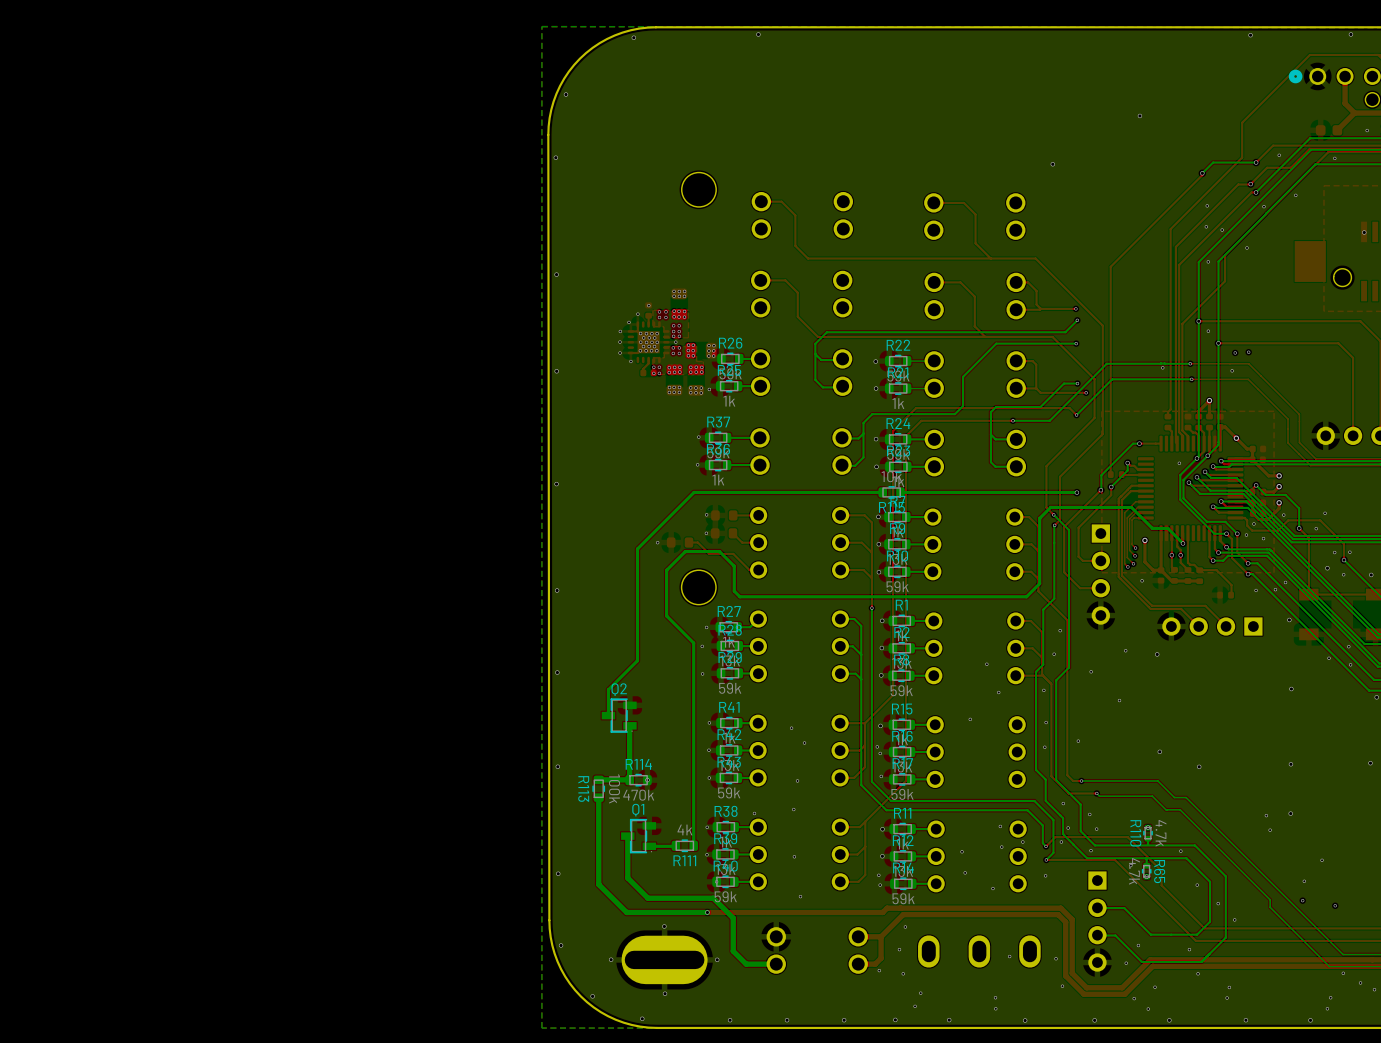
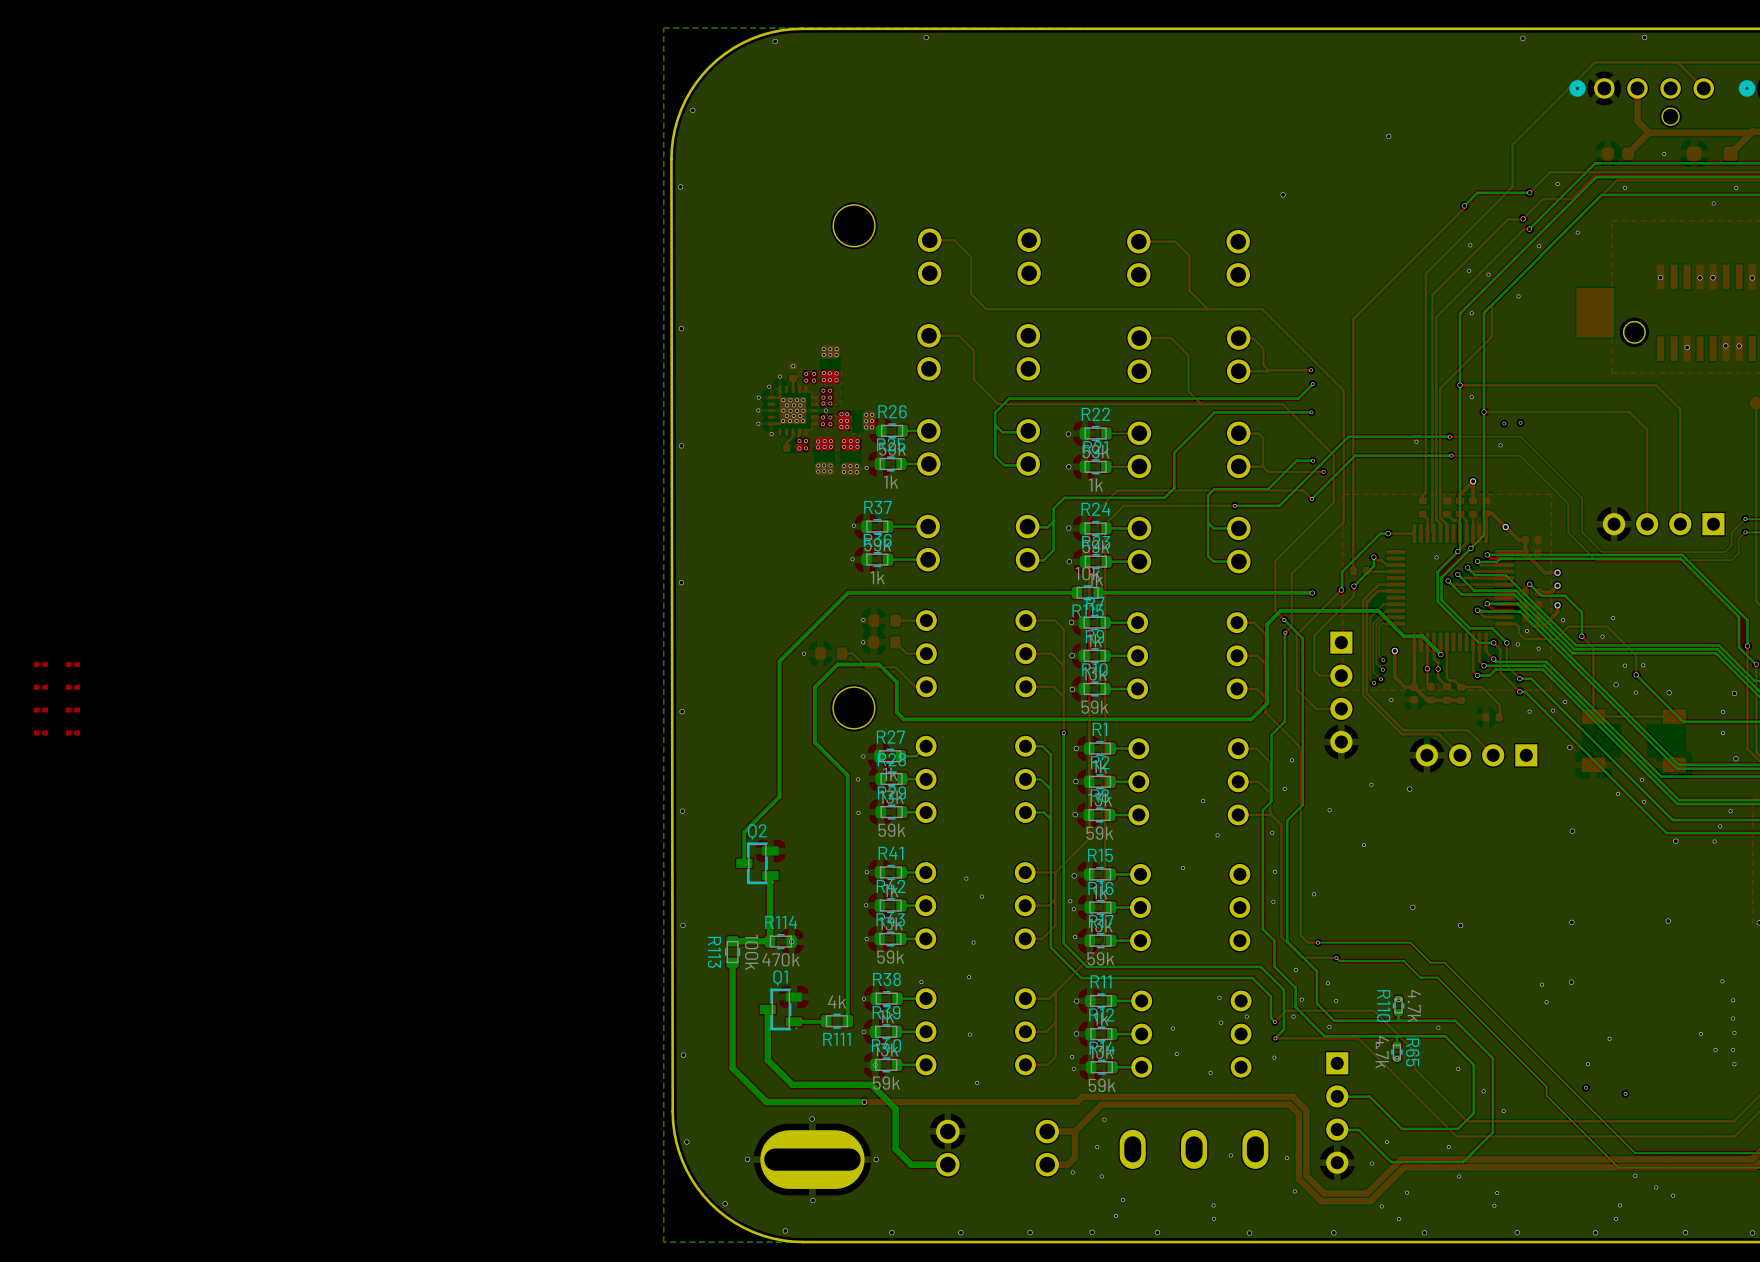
part: none -> (40, 664)
part: none -> (72, 664)
part: none -> (40, 687)
part: none -> (72, 687)
part: none -> (40, 710)
part: none -> (72, 710)
part: none -> (40, 732)
part: none -> (72, 732)

